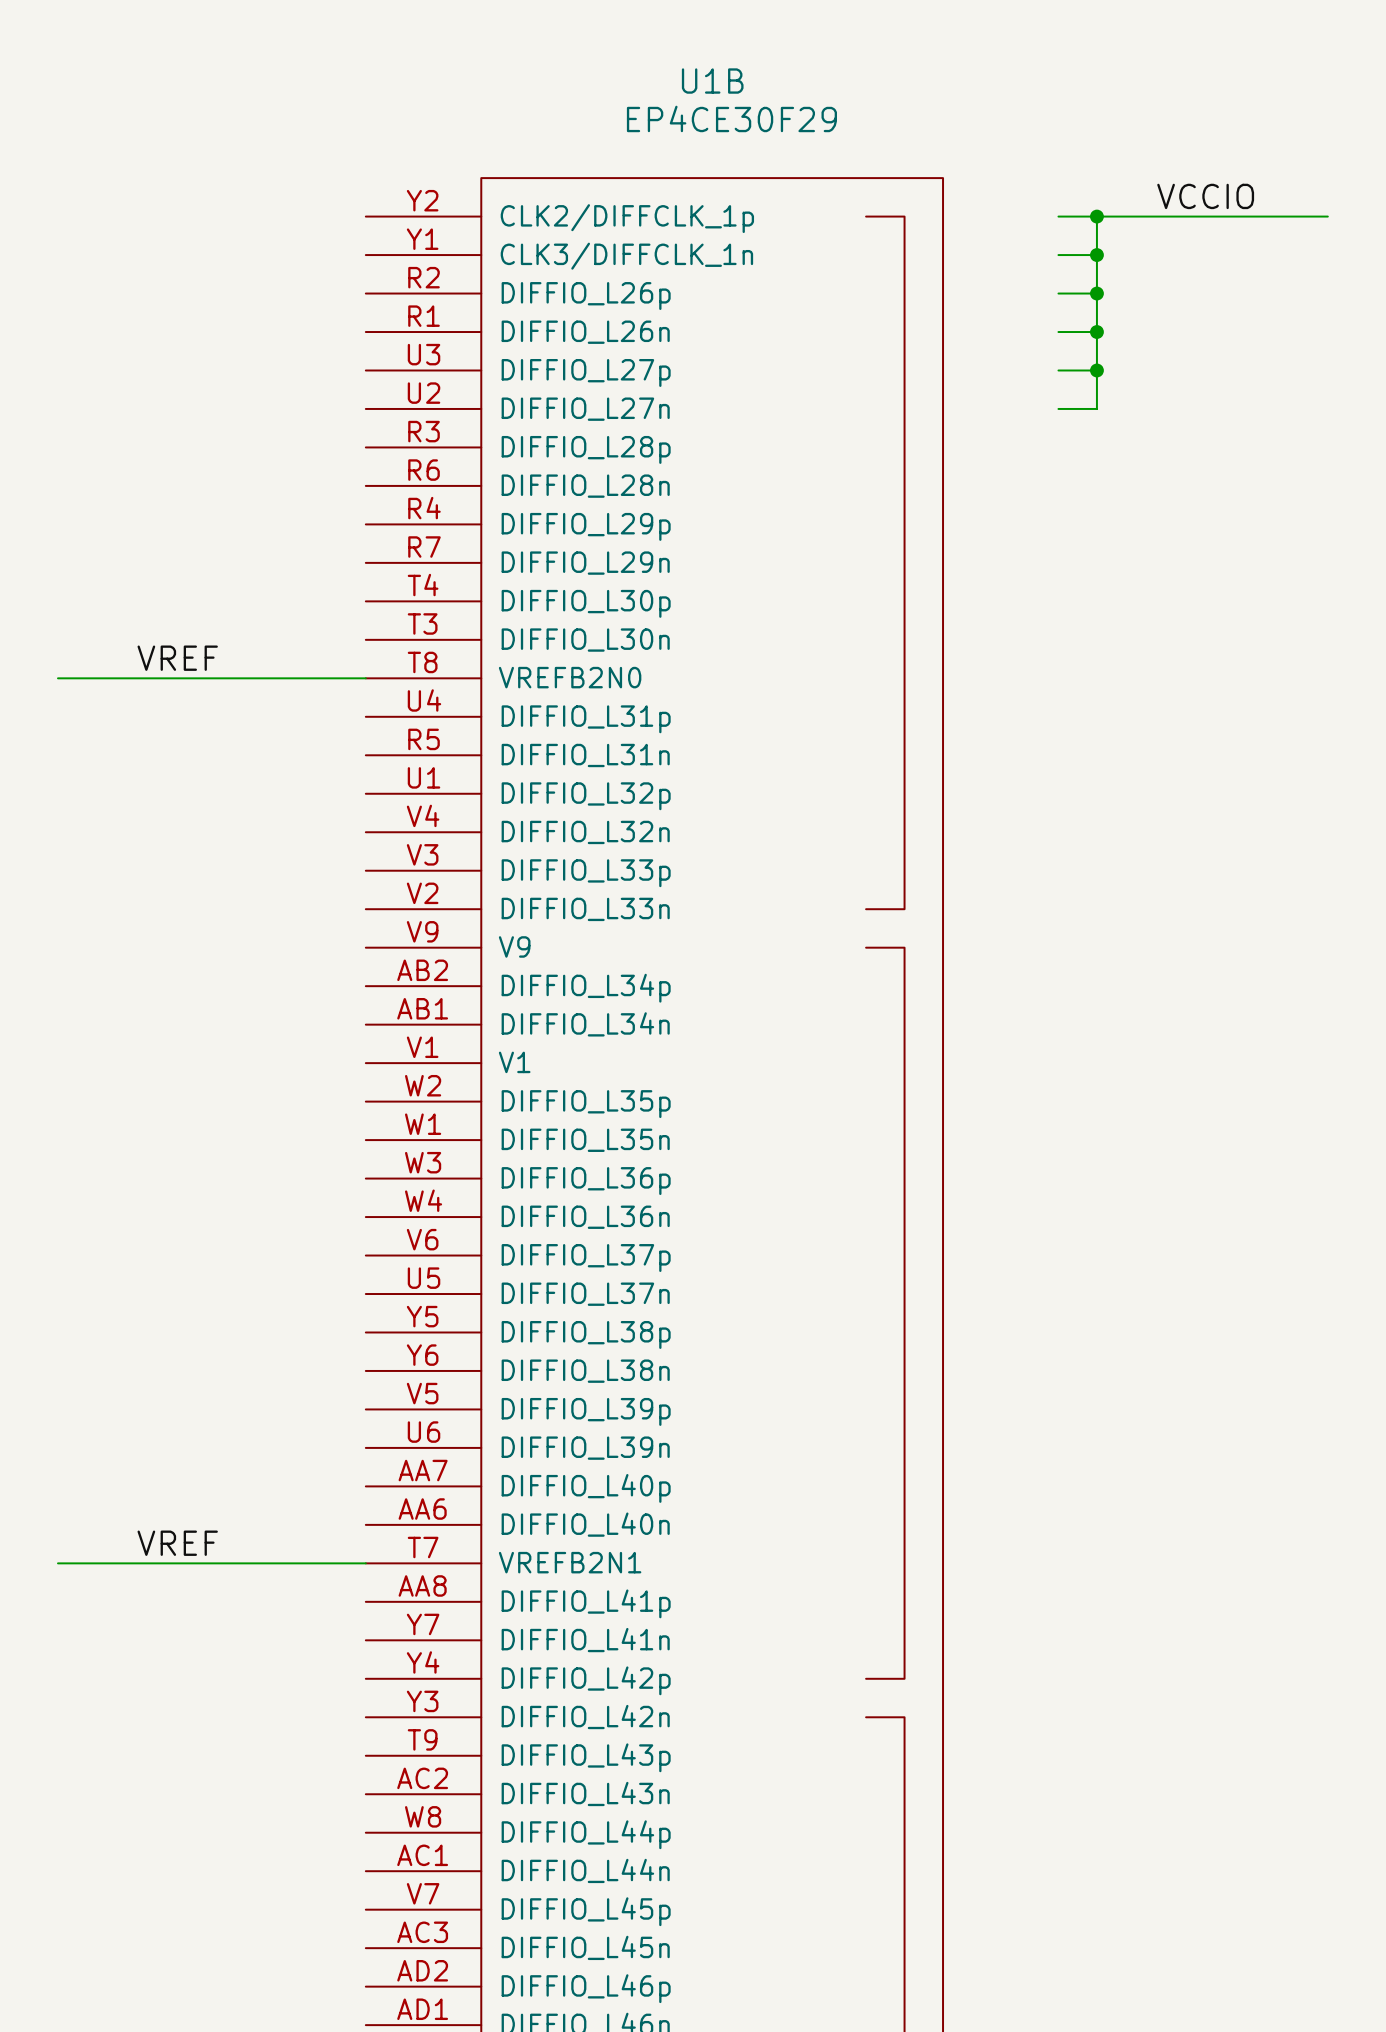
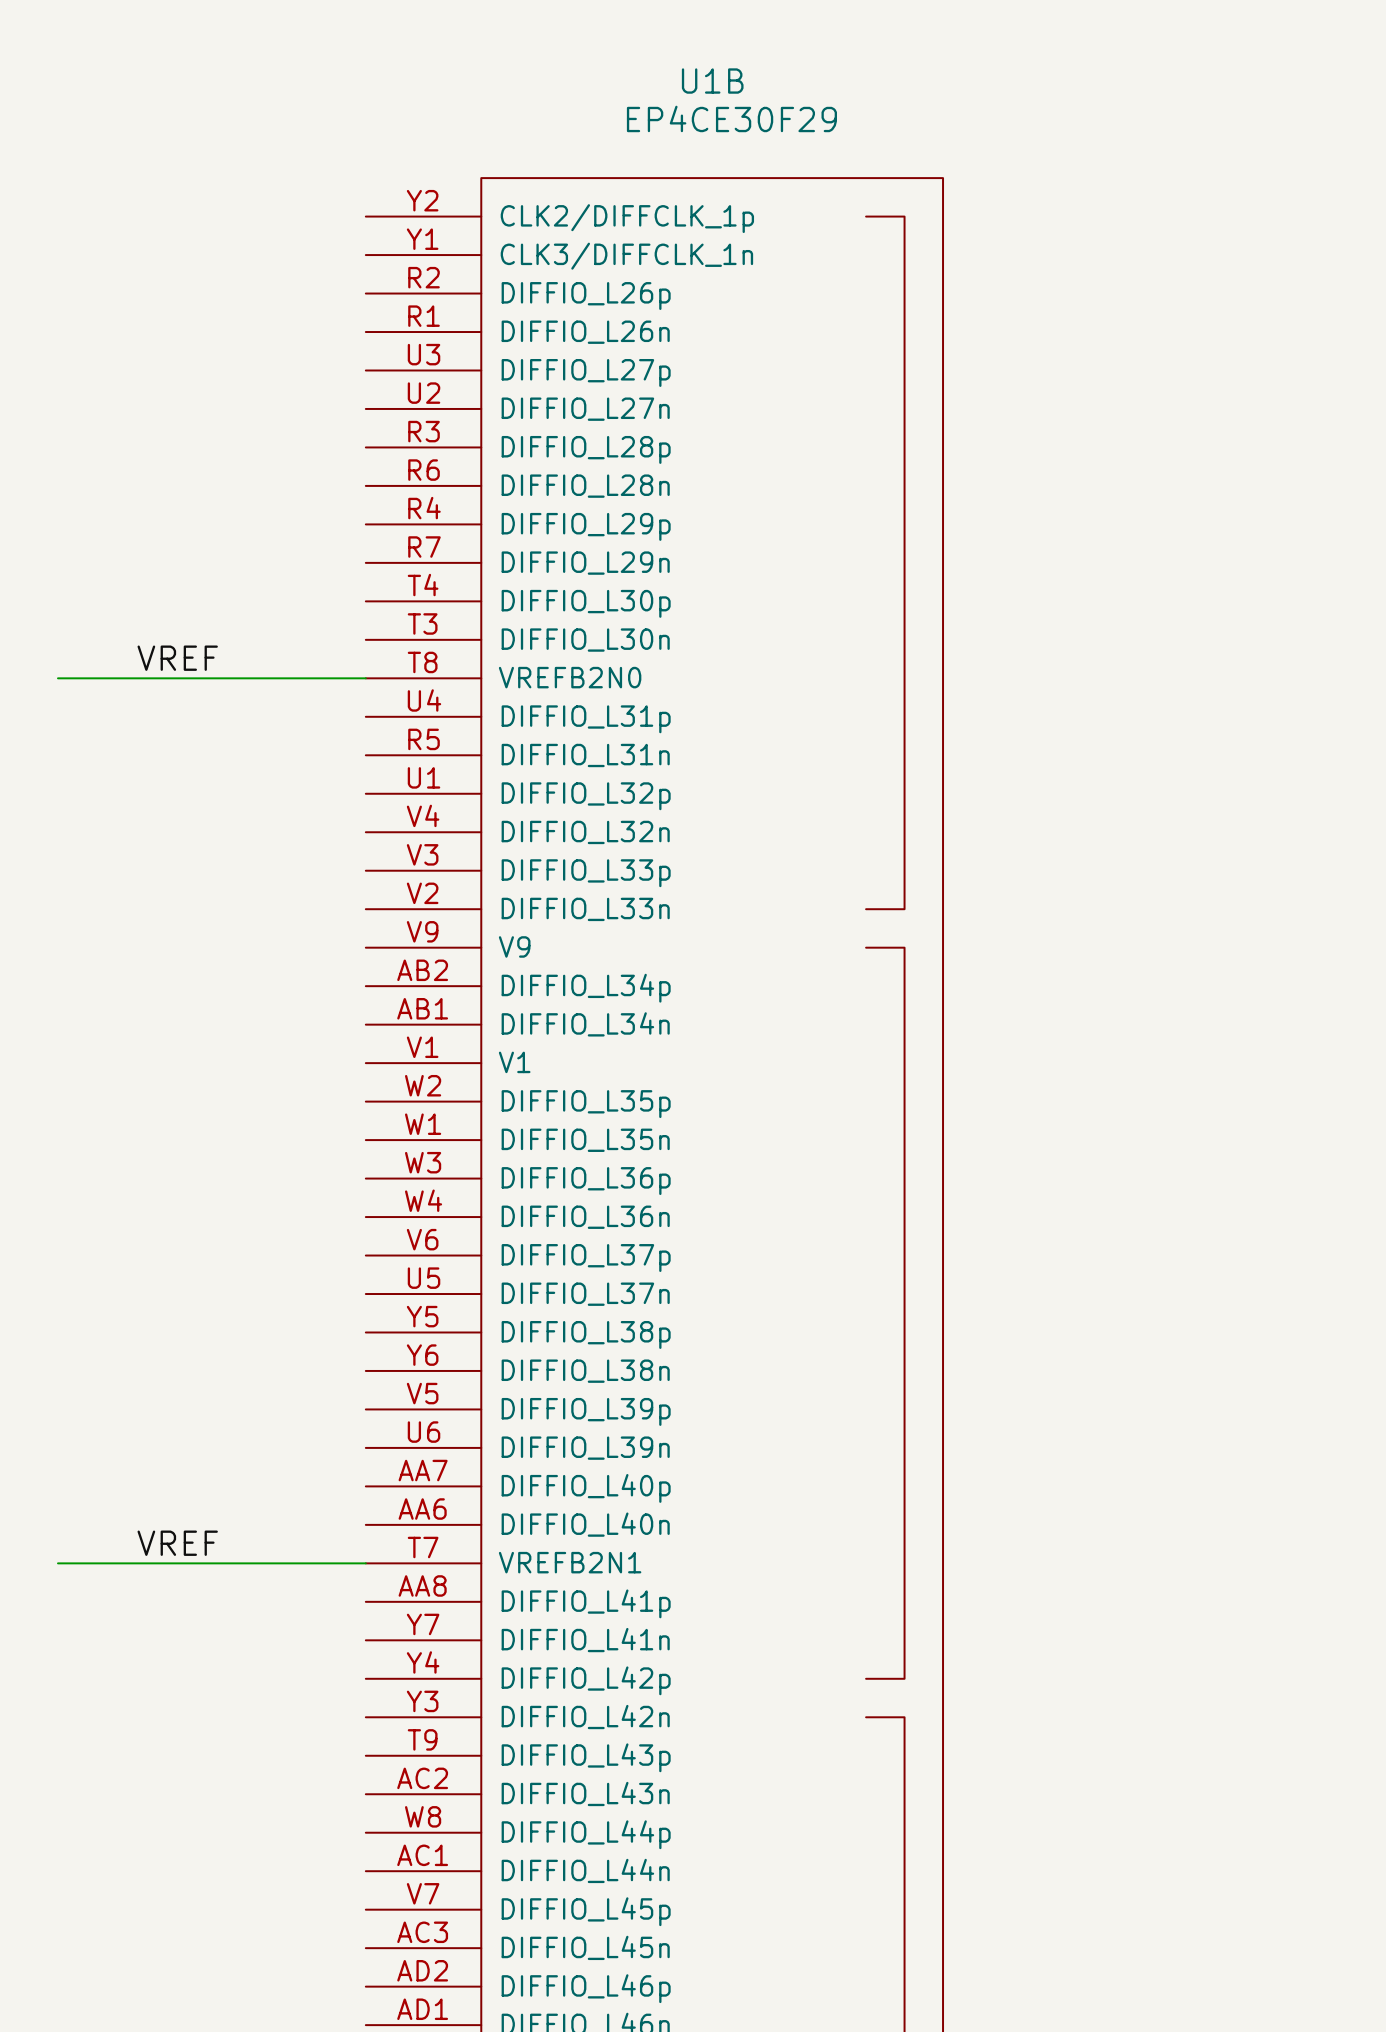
label: VCCIO (1205, 196) -> none
wire: (1058, 216) (1327, 216) -> none
wire: (1096, 216) (1096, 408) (1058, 408) -> none
junction: (1096, 216) -> none
wire: (1058, 255) (1096, 255) -> none
junction: (1096, 255) -> none
wire: (1058, 293) (1096, 293) -> none
junction: (1096, 293) -> none
wire: (1058, 332) (1096, 332) -> none
junction: (1096, 332) -> none
wire: (1058, 370) (1096, 370) -> none
junction: (1096, 370) -> none

